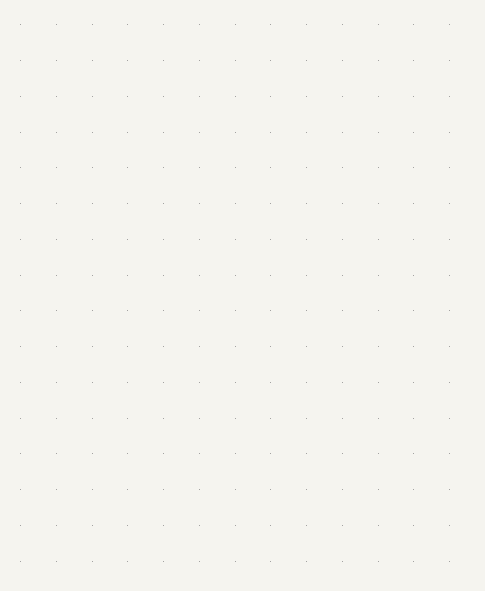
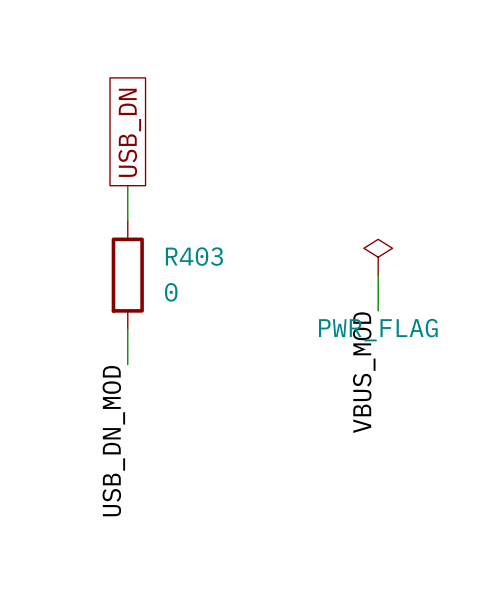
global label: none -> USB_DN (129, 132)
wire: none -> (127, 185) (127, 221)
power symbol: none -> PWR_FLAG (378, 257)
R403: none -> 0 (127, 275)
wire: none -> (378, 275) (378, 310)
wire: none -> (127, 328) (127, 364)
label: none -> VBUS_MOD (364, 372)
label: none -> USB_DN_MOD (113, 441)

